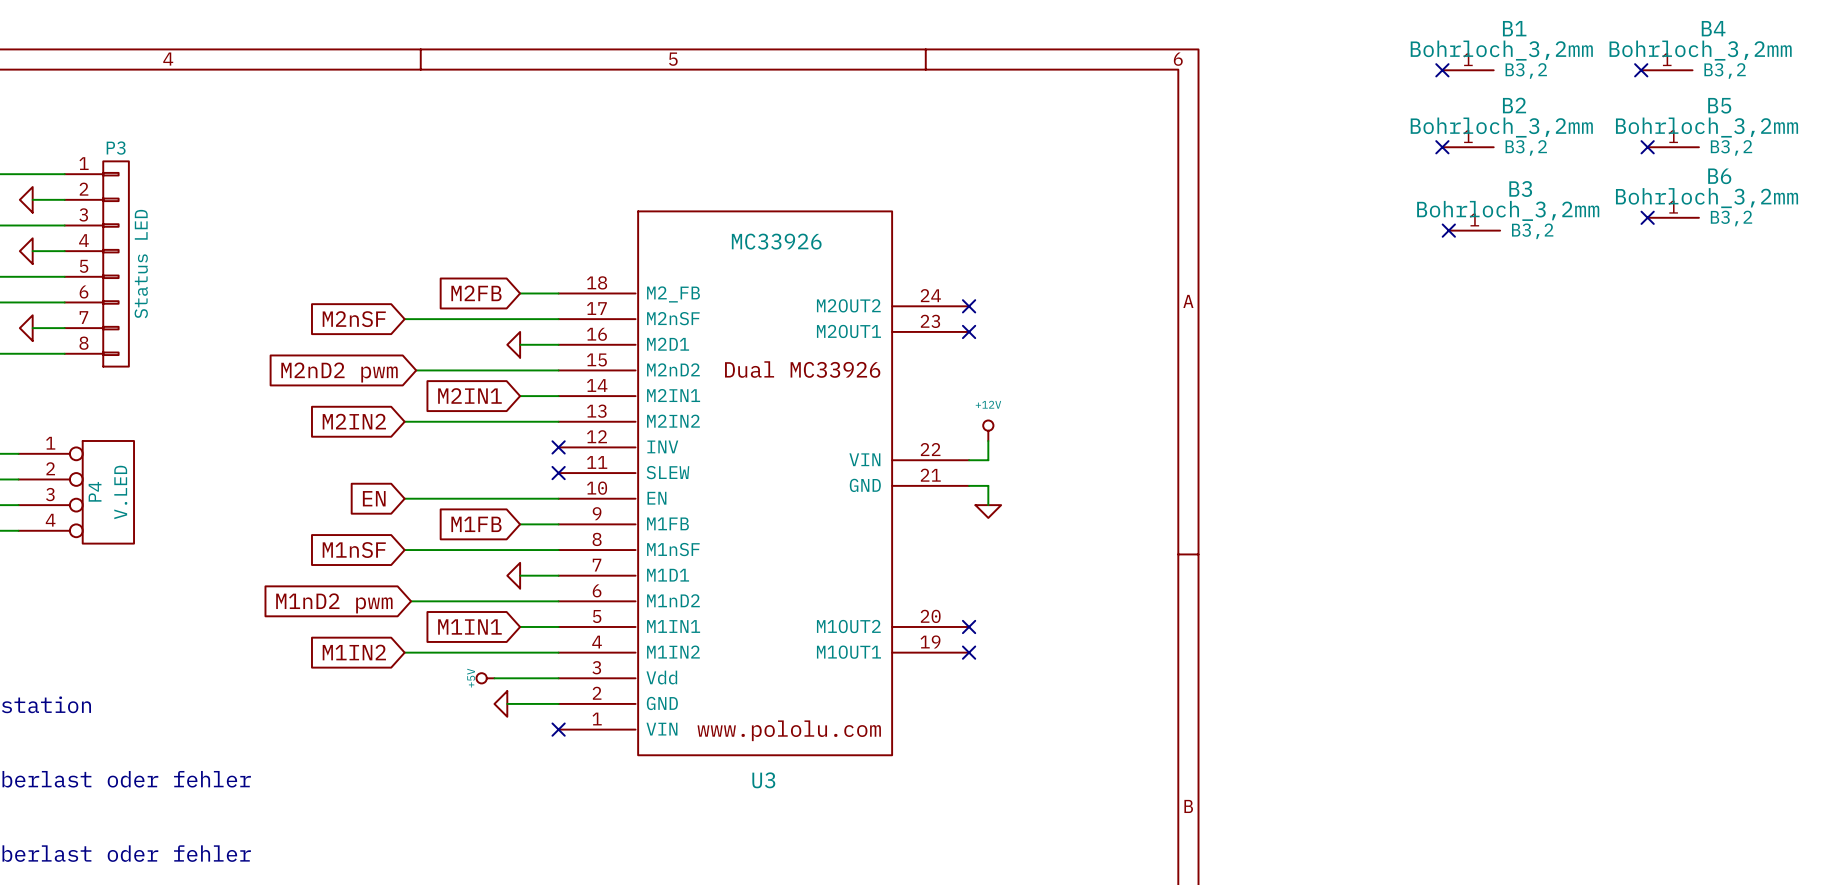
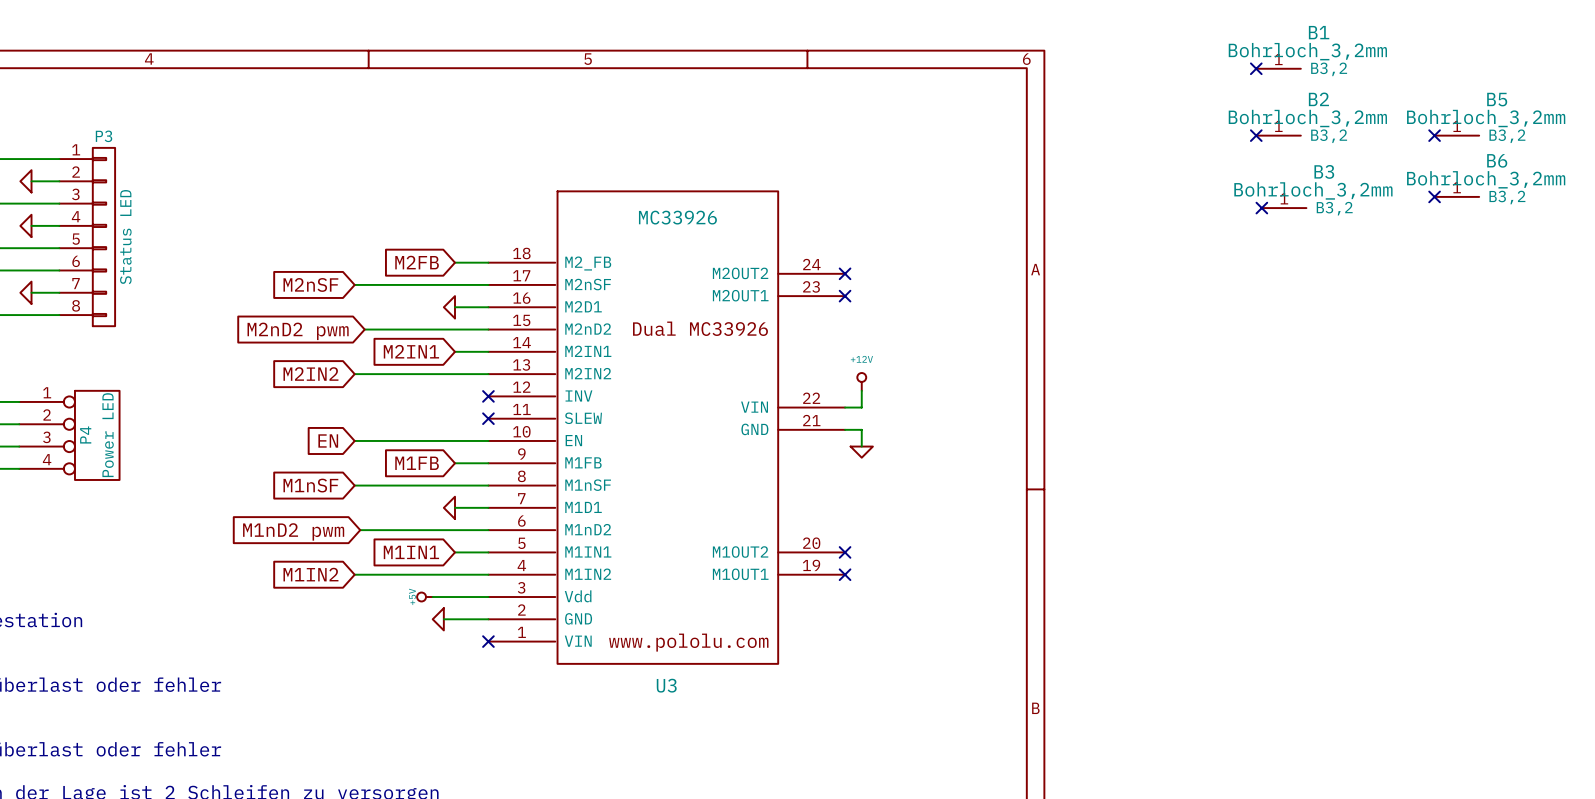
no-connect mark: (1641, 70) -> none
B4: Bohrloch_3,2mm (1666, 70) -> none
P4 value: V.LED (120, 492) -> Power LED (108, 435)

